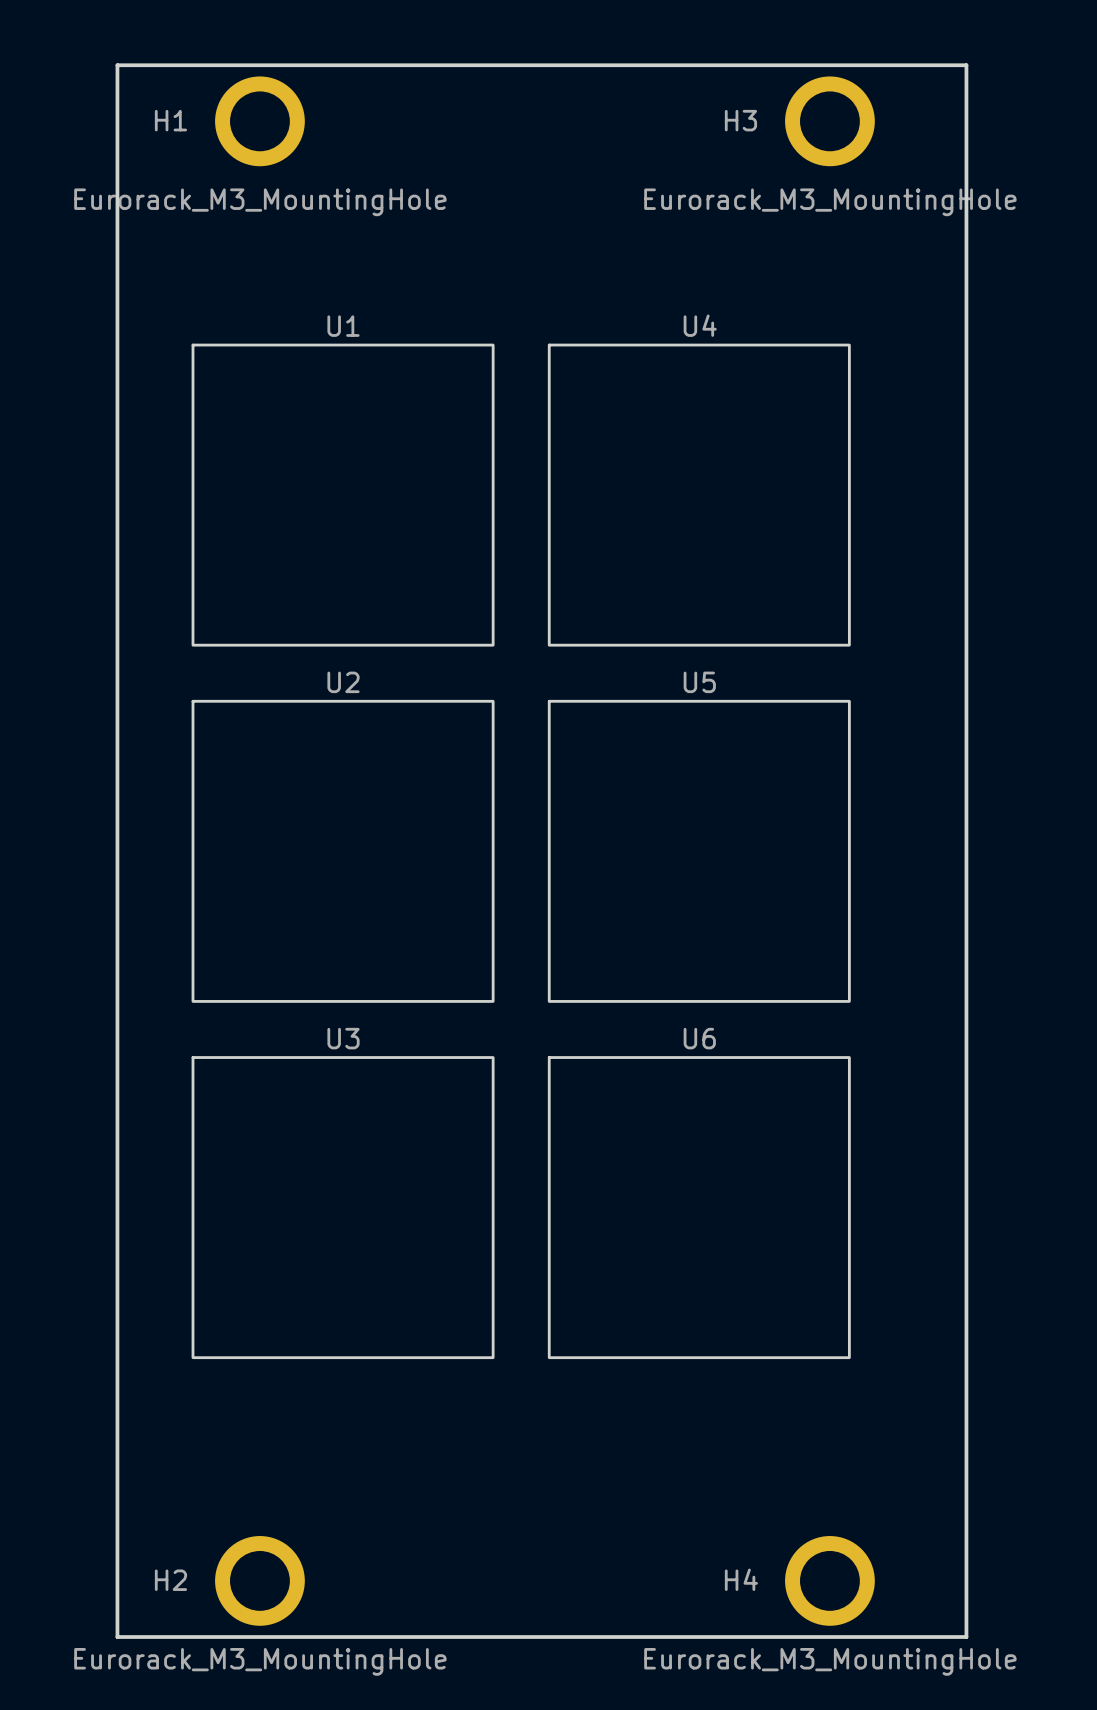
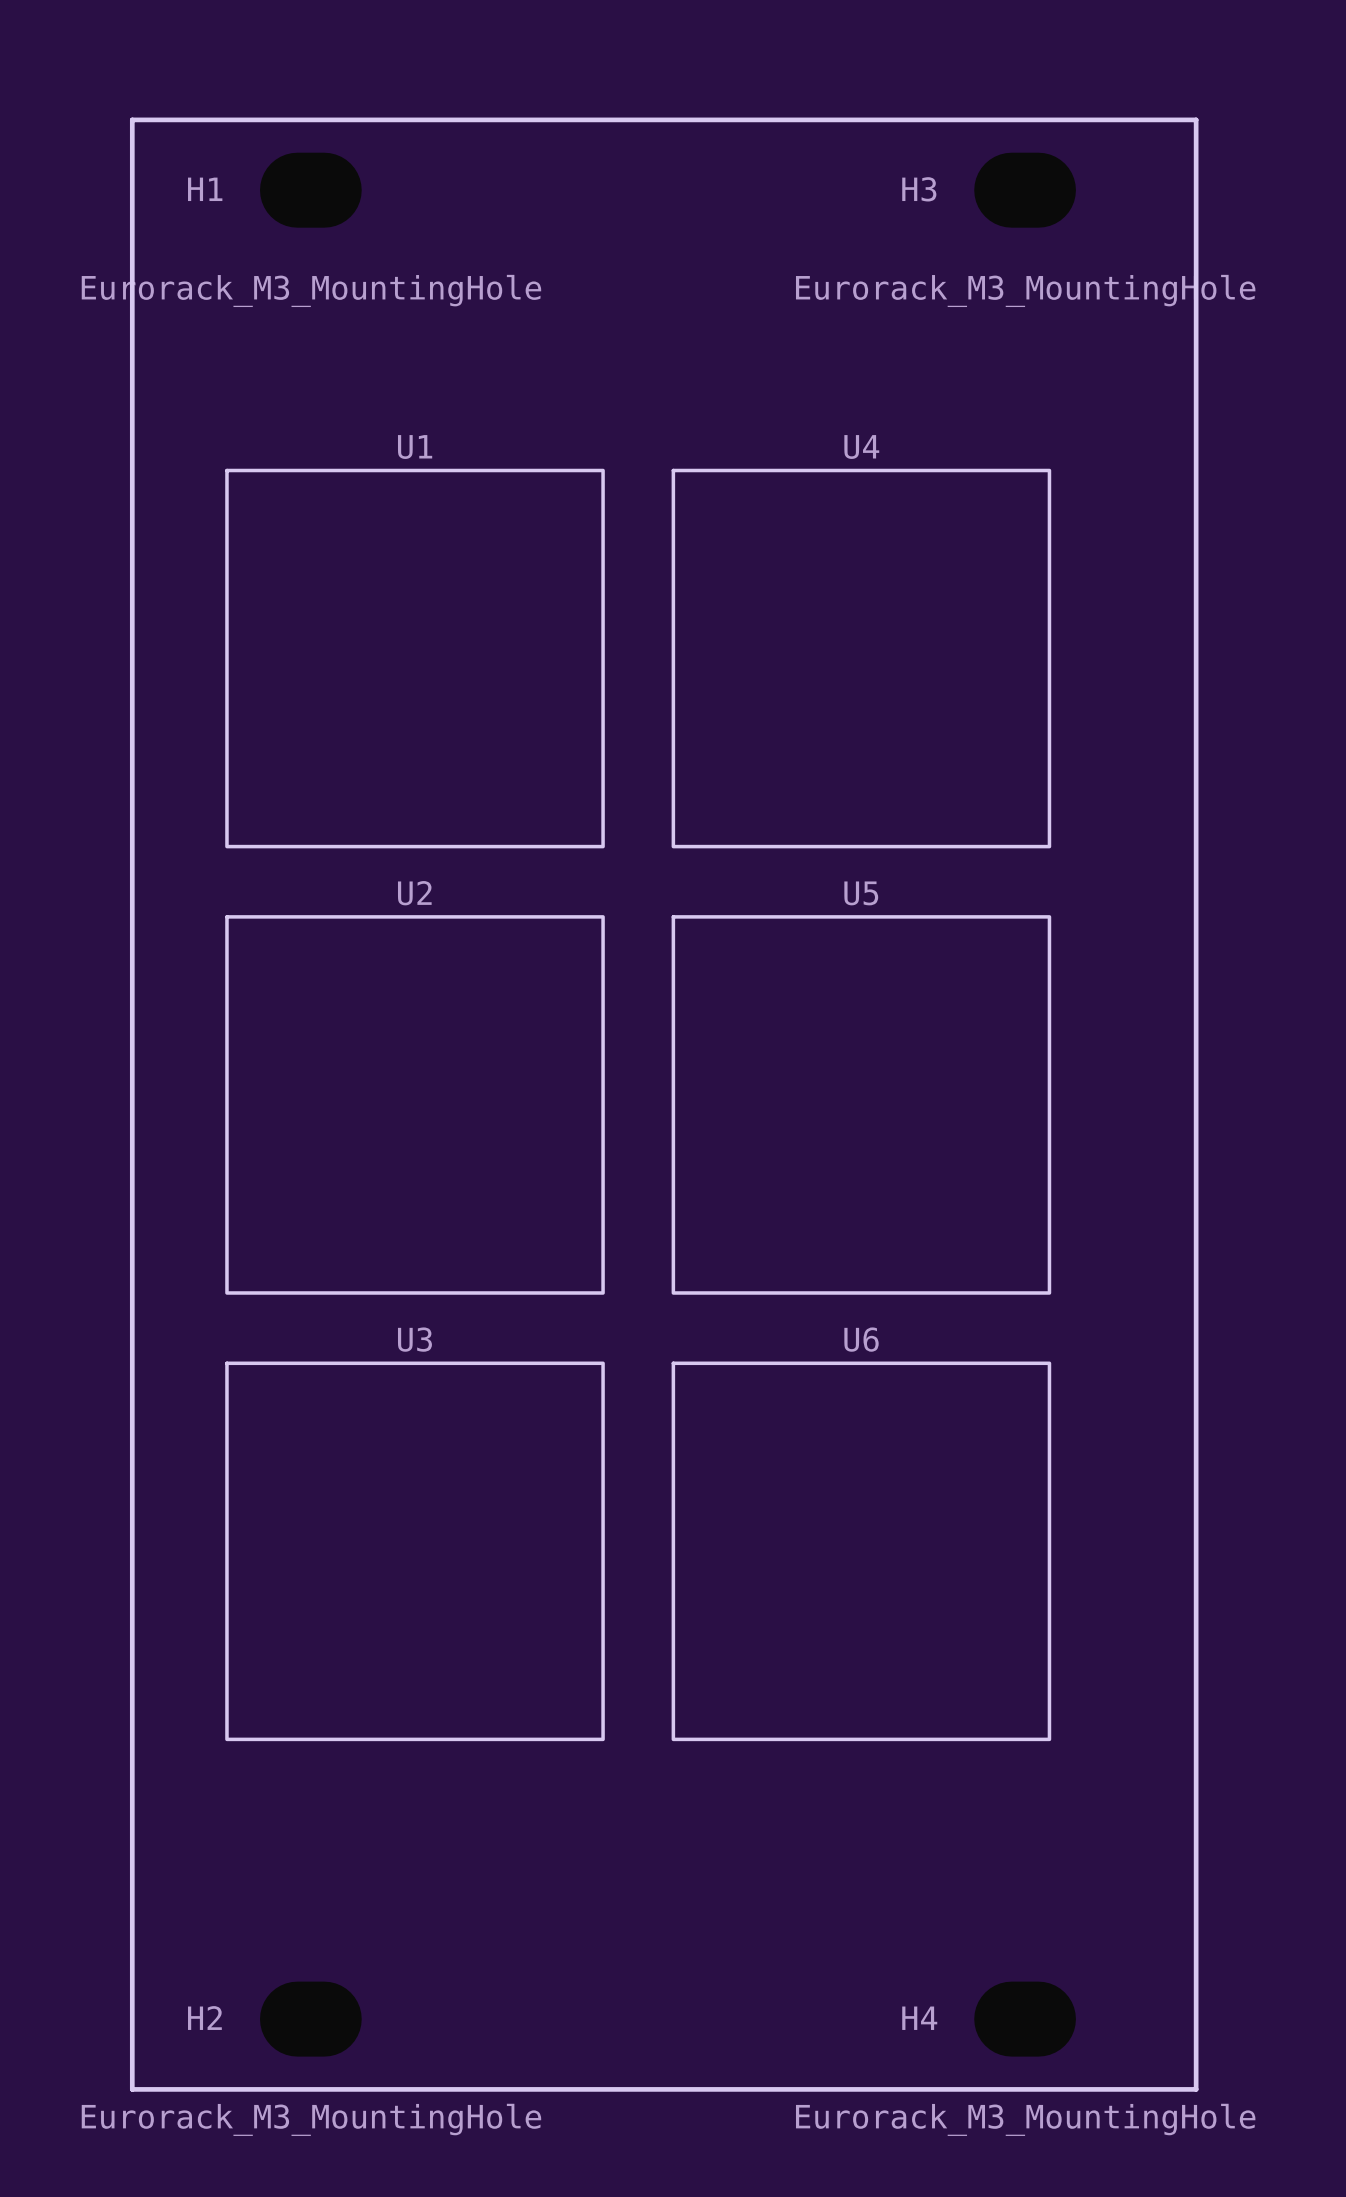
H1 footprint: [215, 76, 305, 167] -> [260, 152, 362, 228]
H3 footprint: [785, 76, 875, 167] -> [974, 152, 1076, 228]
H2 footprint: [215, 1536, 305, 1626] -> [260, 1981, 362, 2057]
H4 footprint: [785, 1536, 875, 1626] -> [974, 1981, 1076, 2057]

